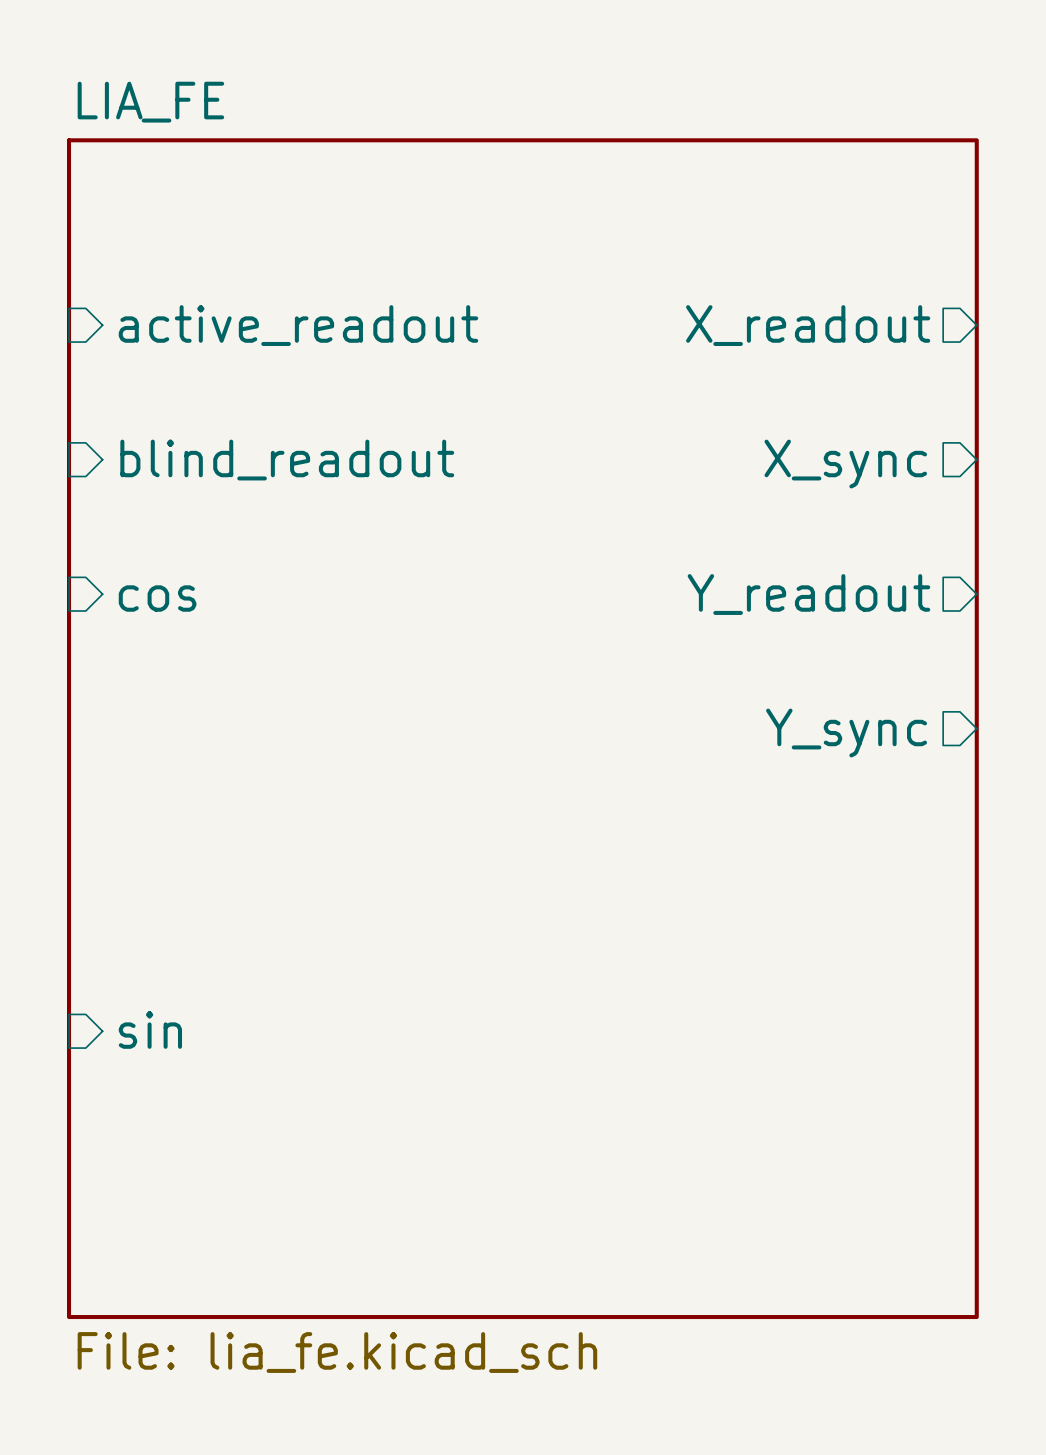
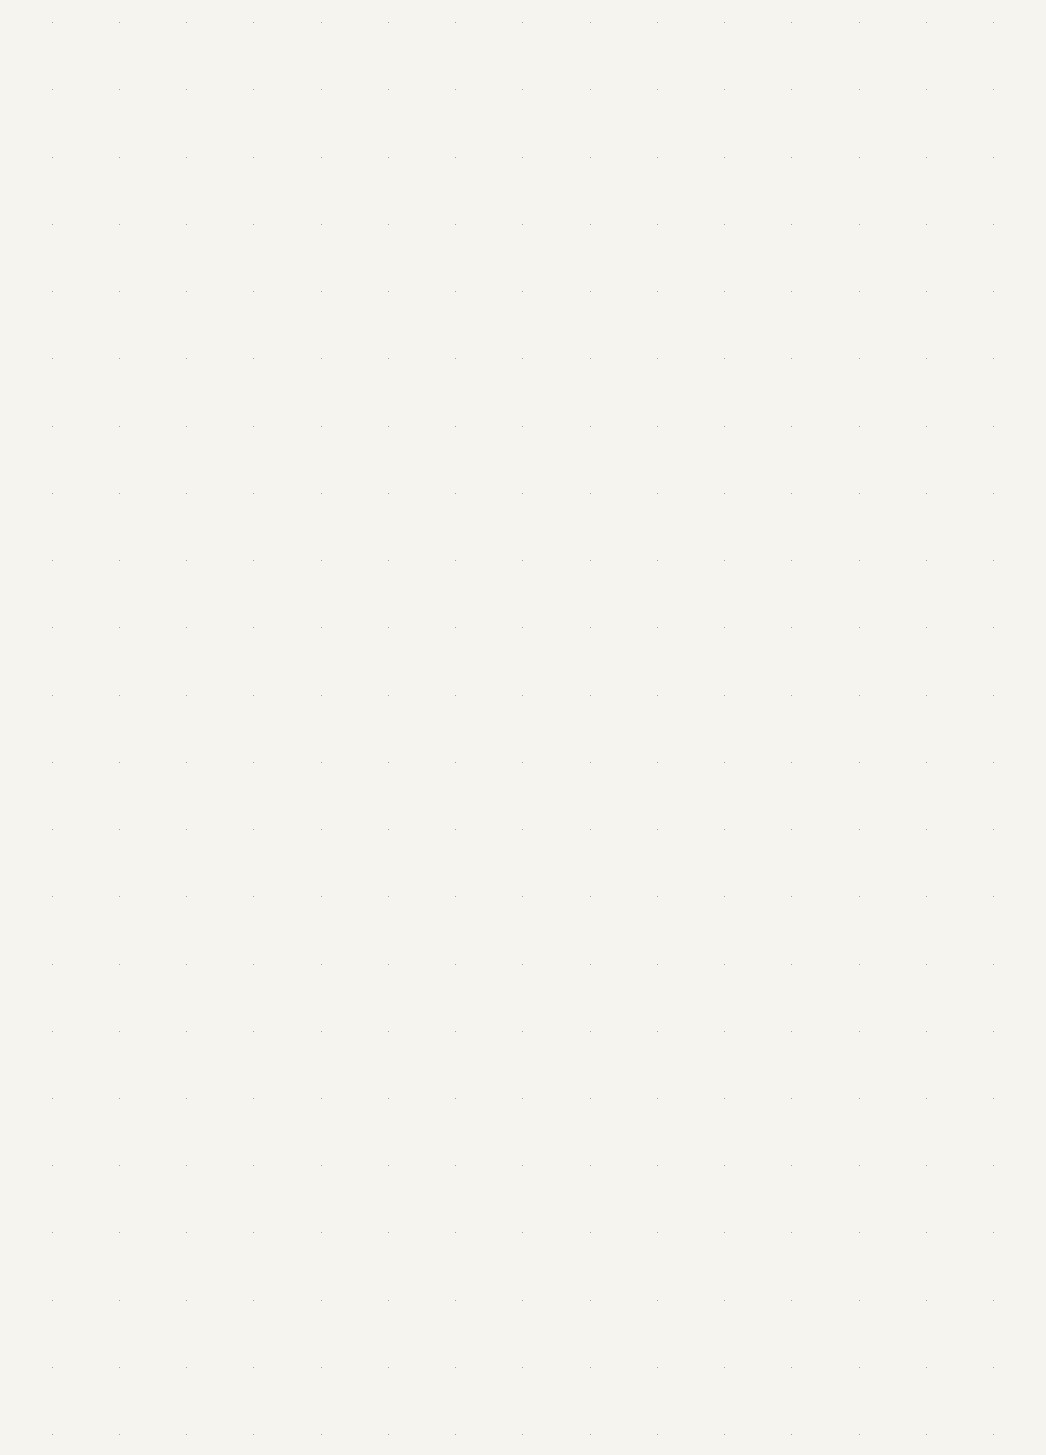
sheet pin: active_readout (298, 325) -> none
sheet pin: X_readout (808, 325) -> none
sheet pin: blind_readout (287, 460) -> none
sheet pin: X_sync (845, 464) -> none
sheet pin: Y_readout (808, 594) -> none
sheet pin: cos (157, 598) -> none
sheet LIA_FE: File: lia_fe.kicad_sch (522, 728) -> none
sheet pin: Y_sync (846, 733) -> none
sheet pin: sin (150, 1029) -> none

